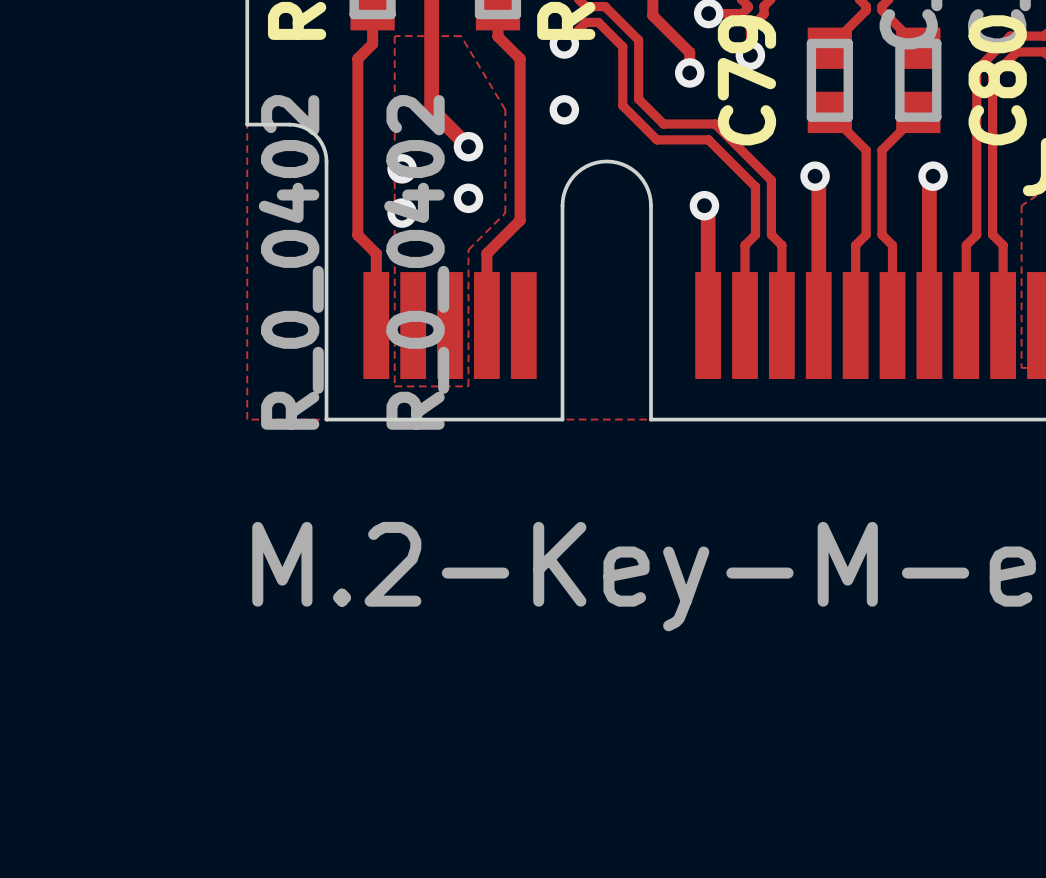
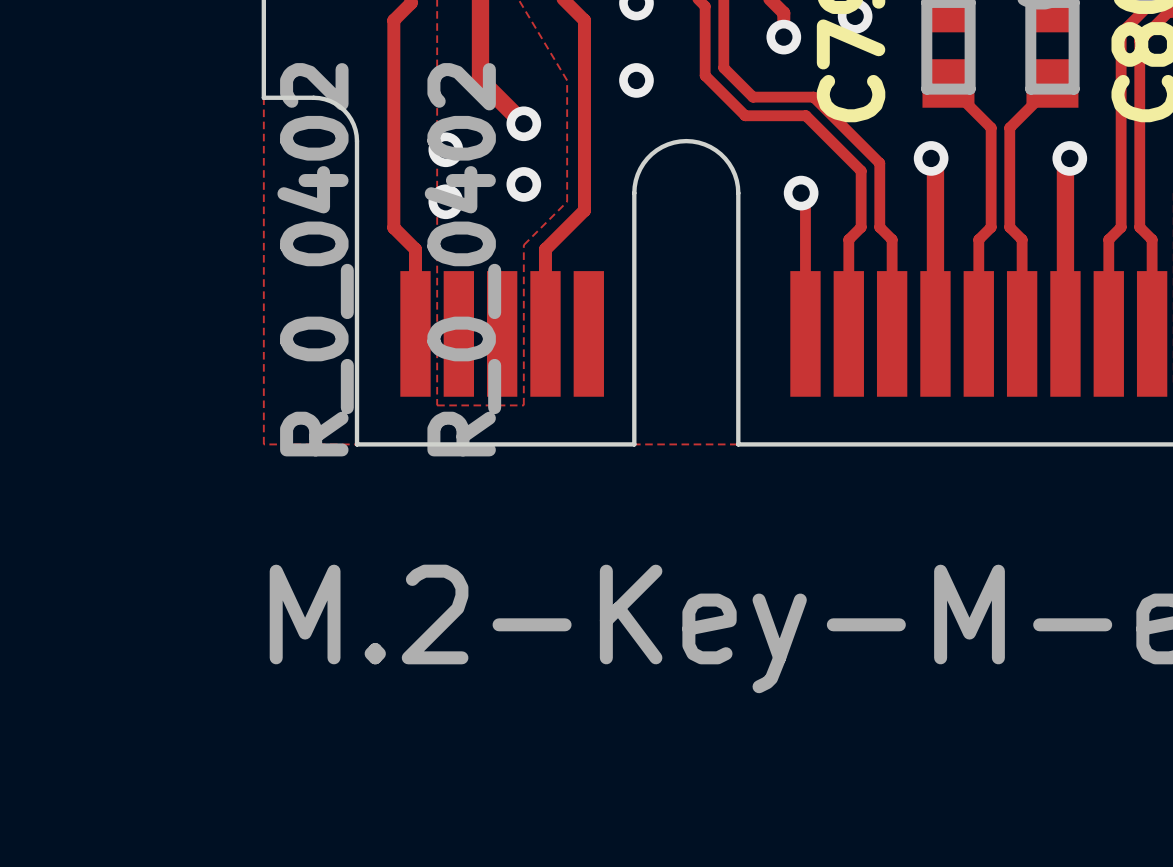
track width: thick (704, 205) (708, 209) (708, 325) -> thin (801, 193) (805, 197) (805, 333)

